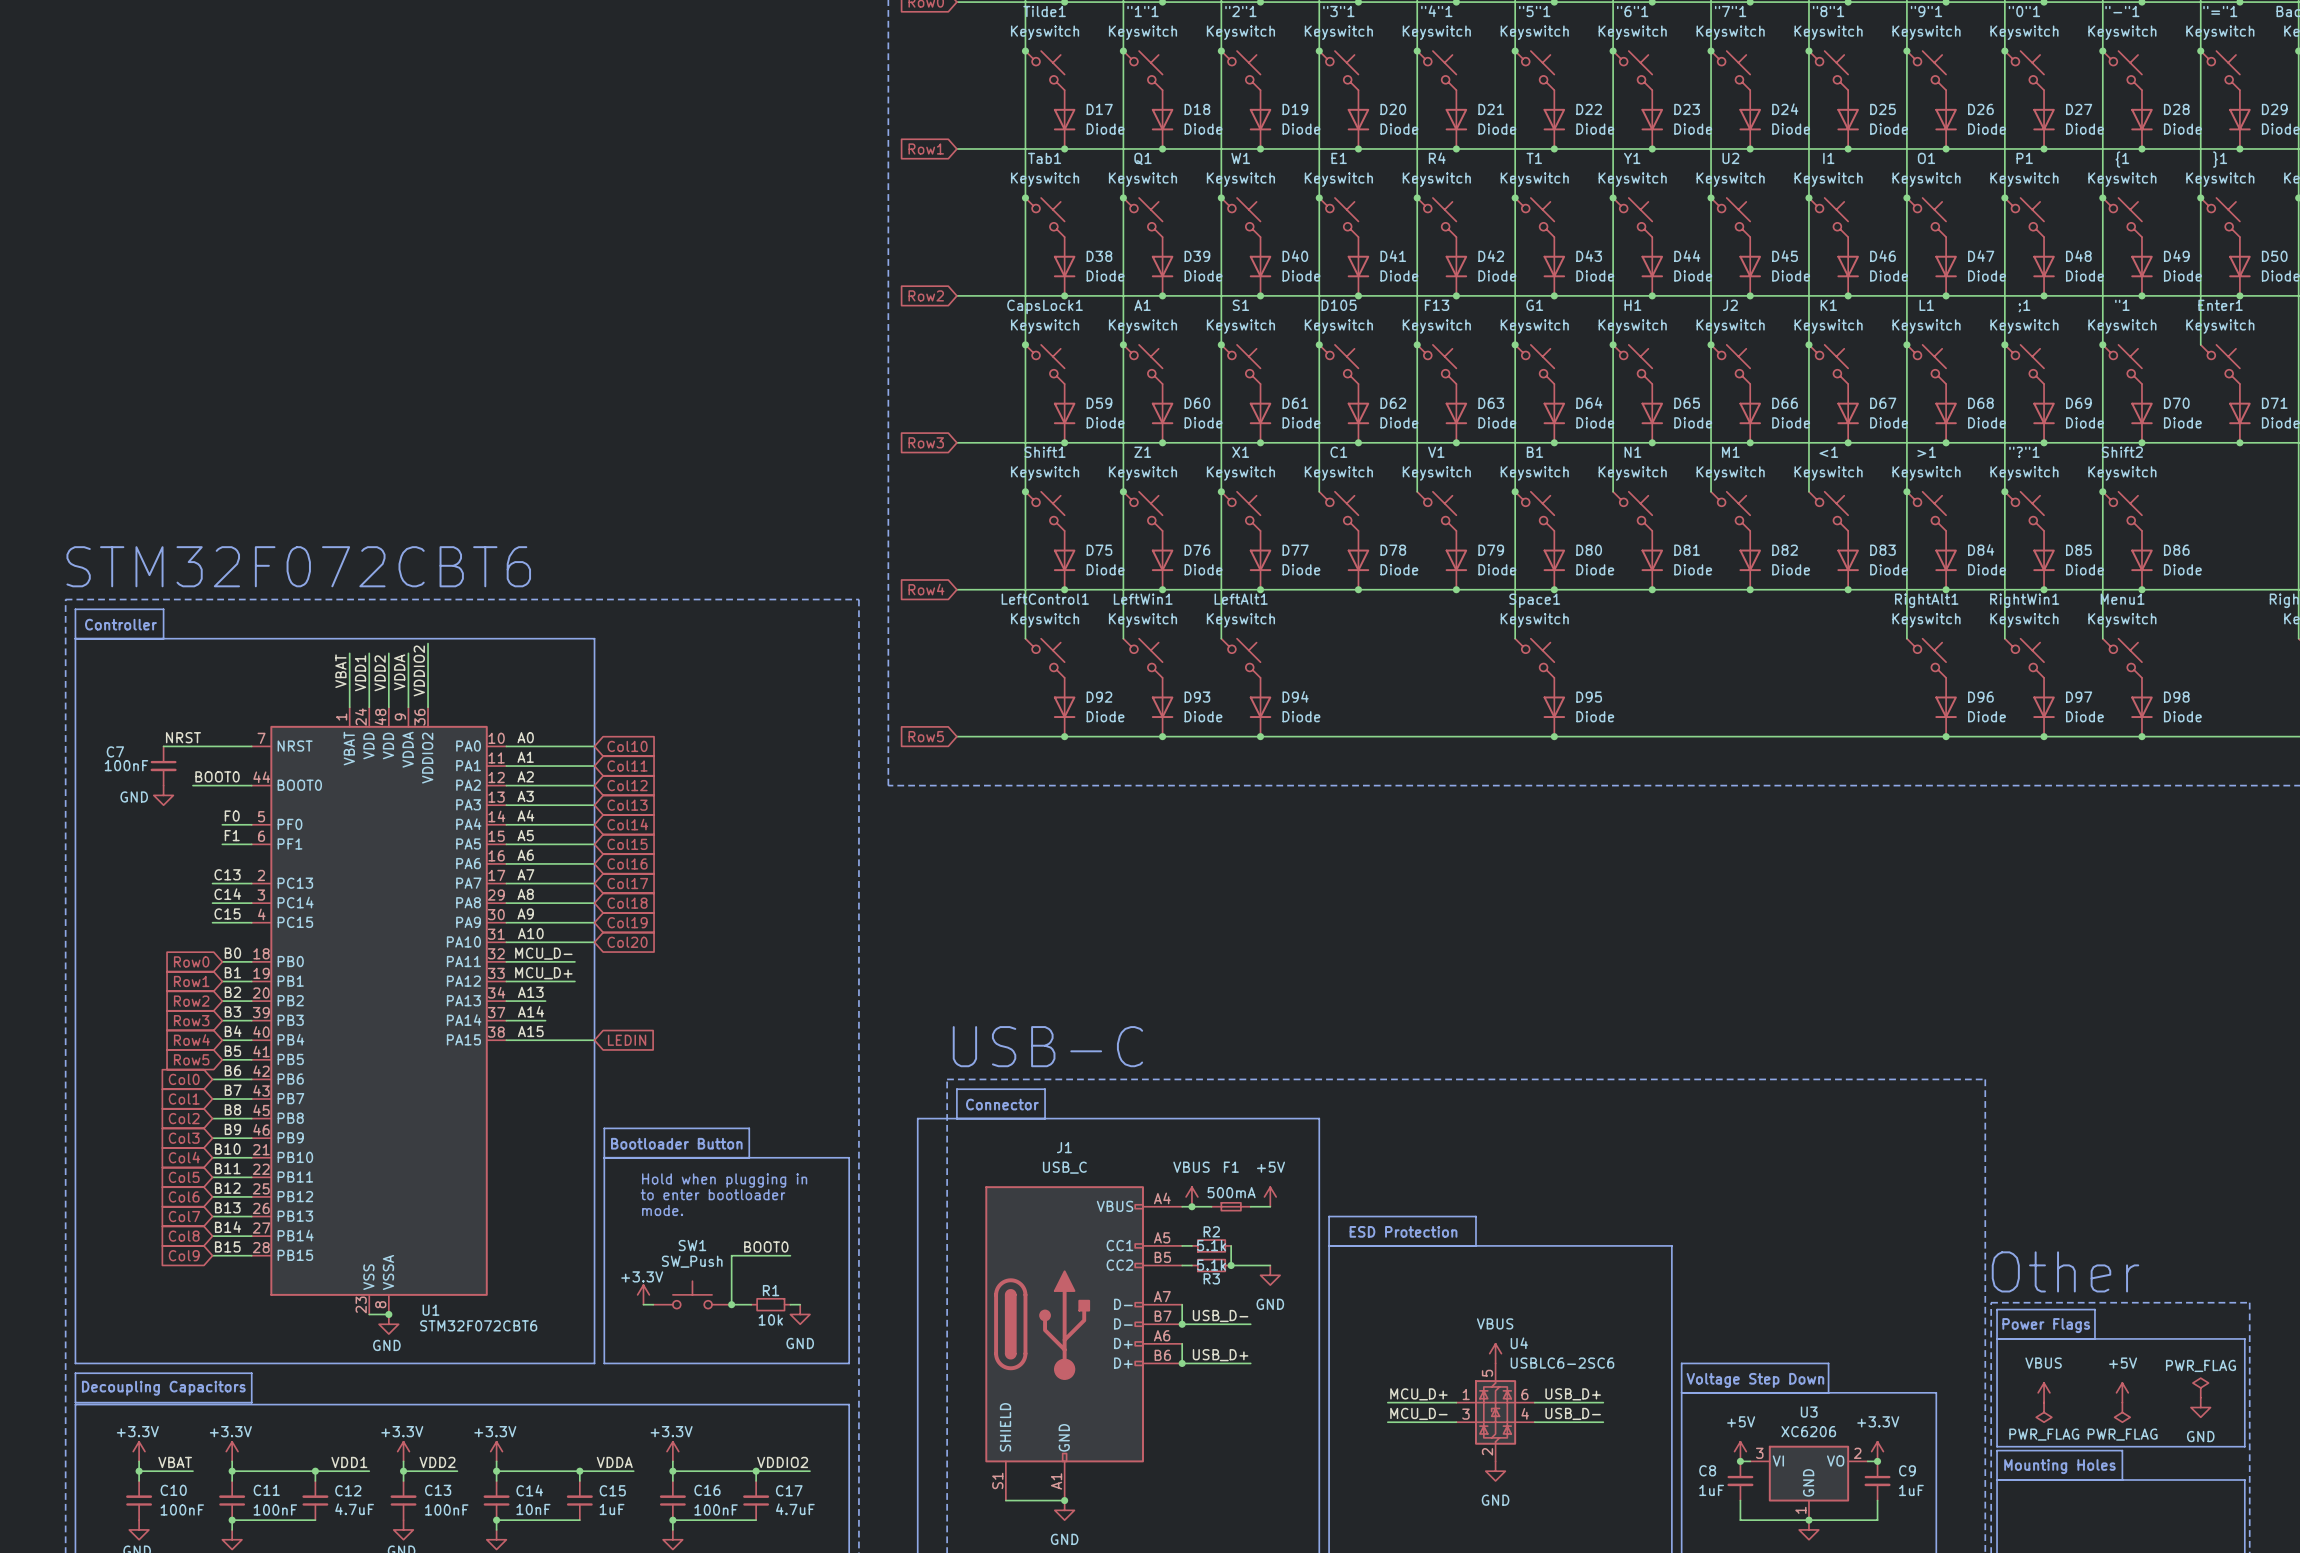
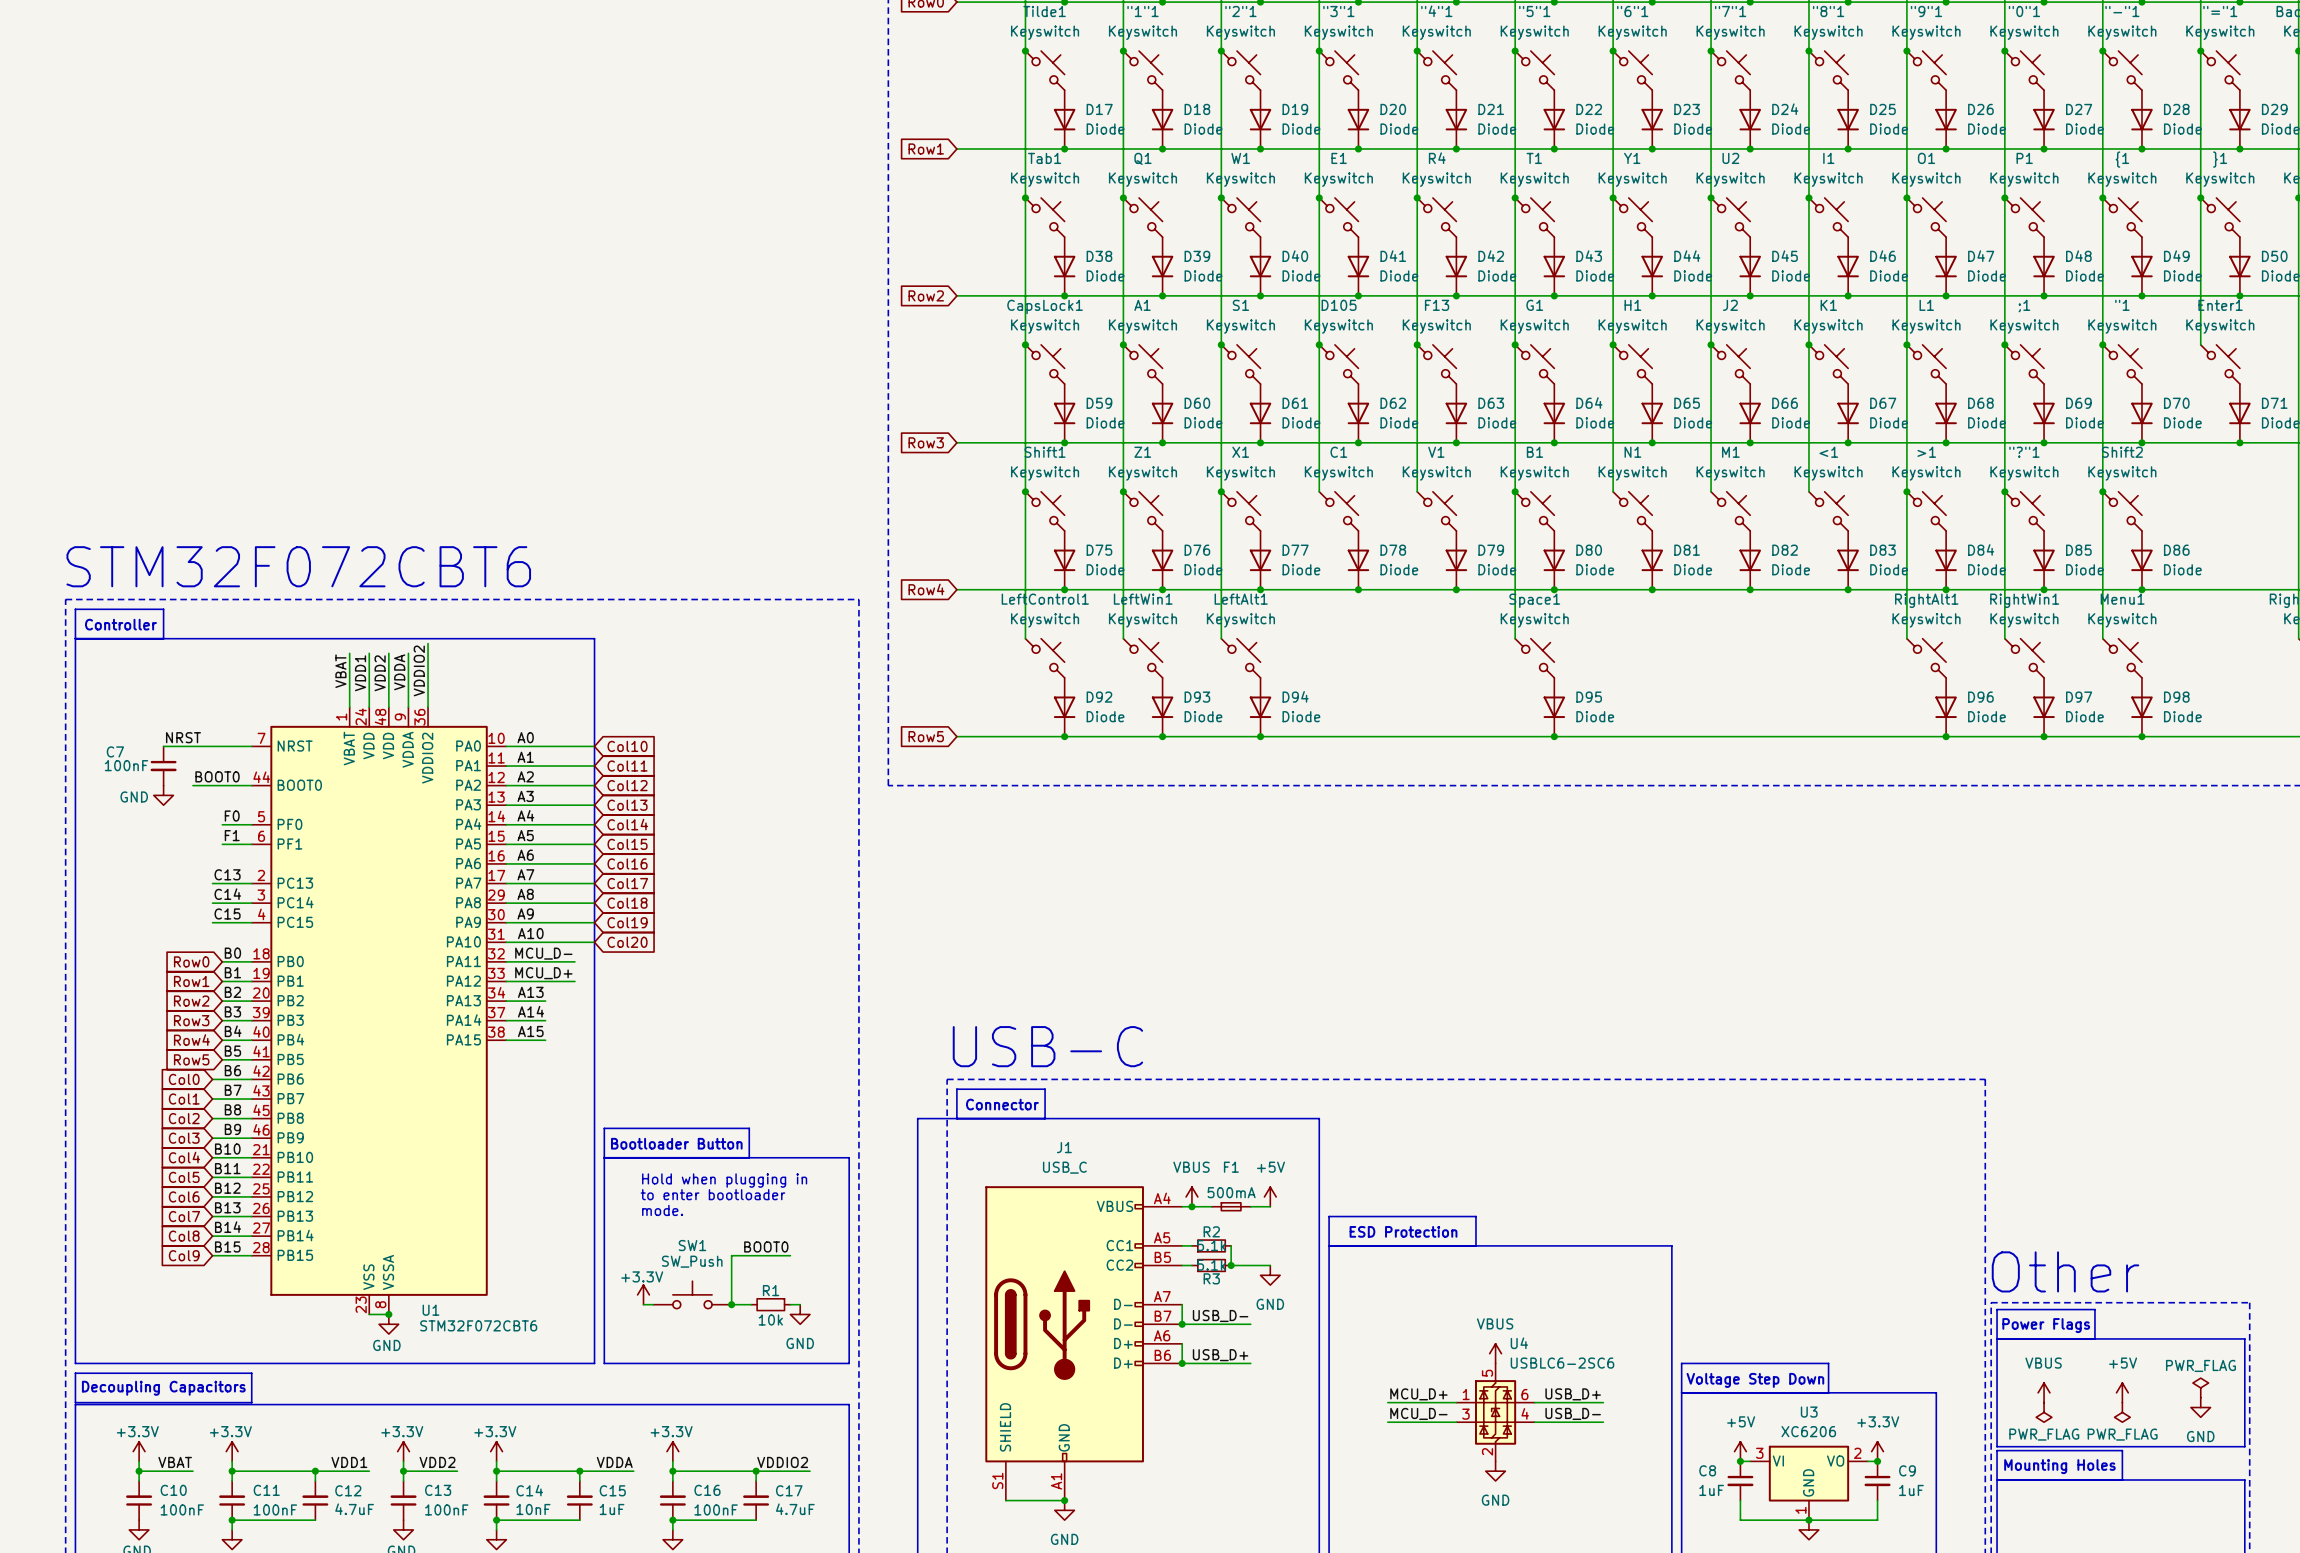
wire: (545, 1040) (594, 1040) -> none
global label: LEDIN (627, 1040) -> none

